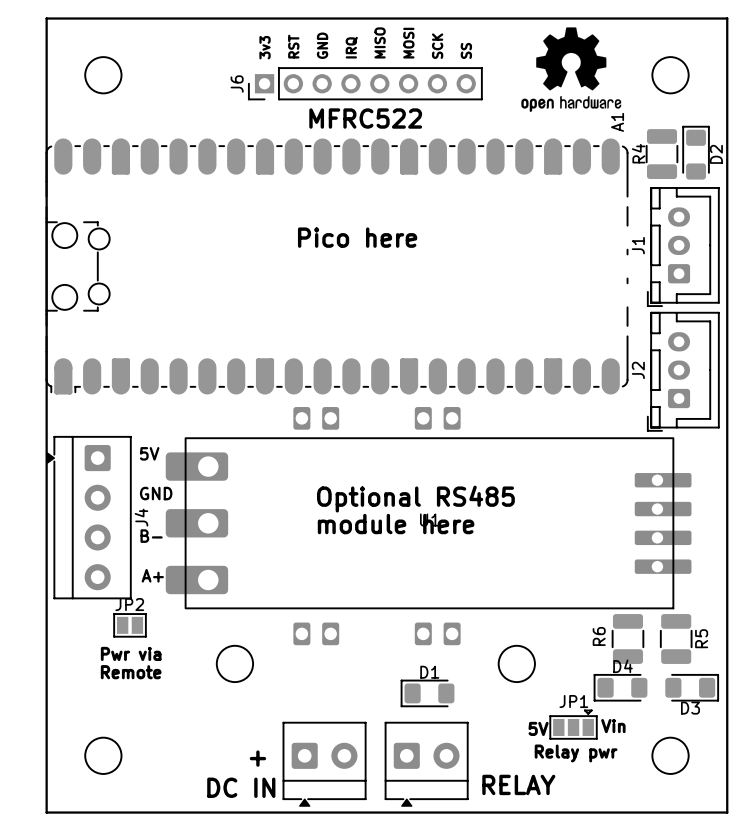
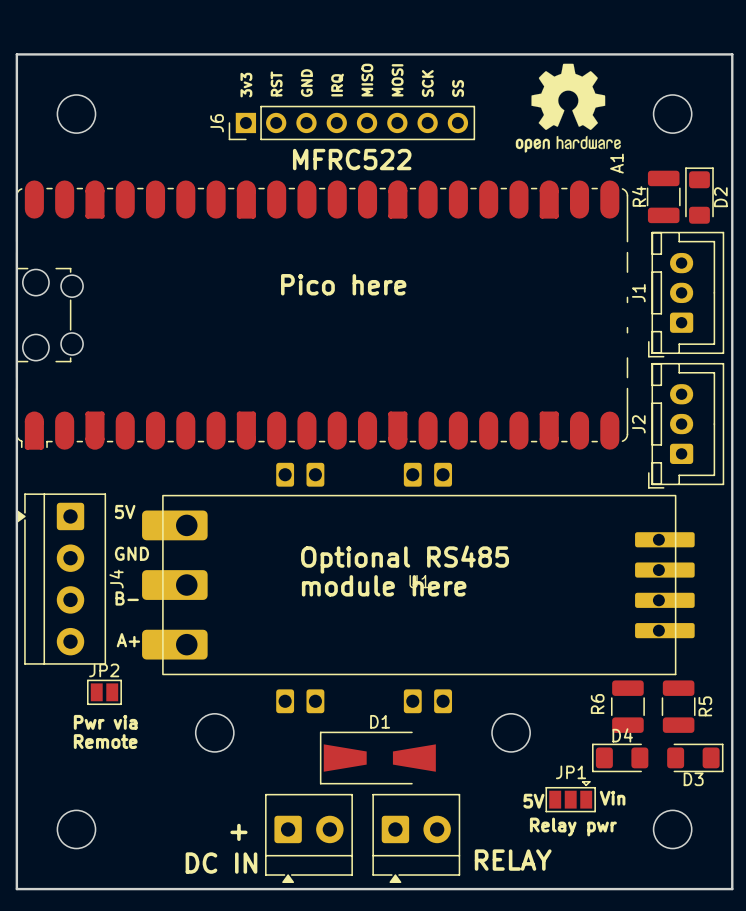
D1 footprint: [400, 679, 455, 707] -> [319, 731, 436, 785]

